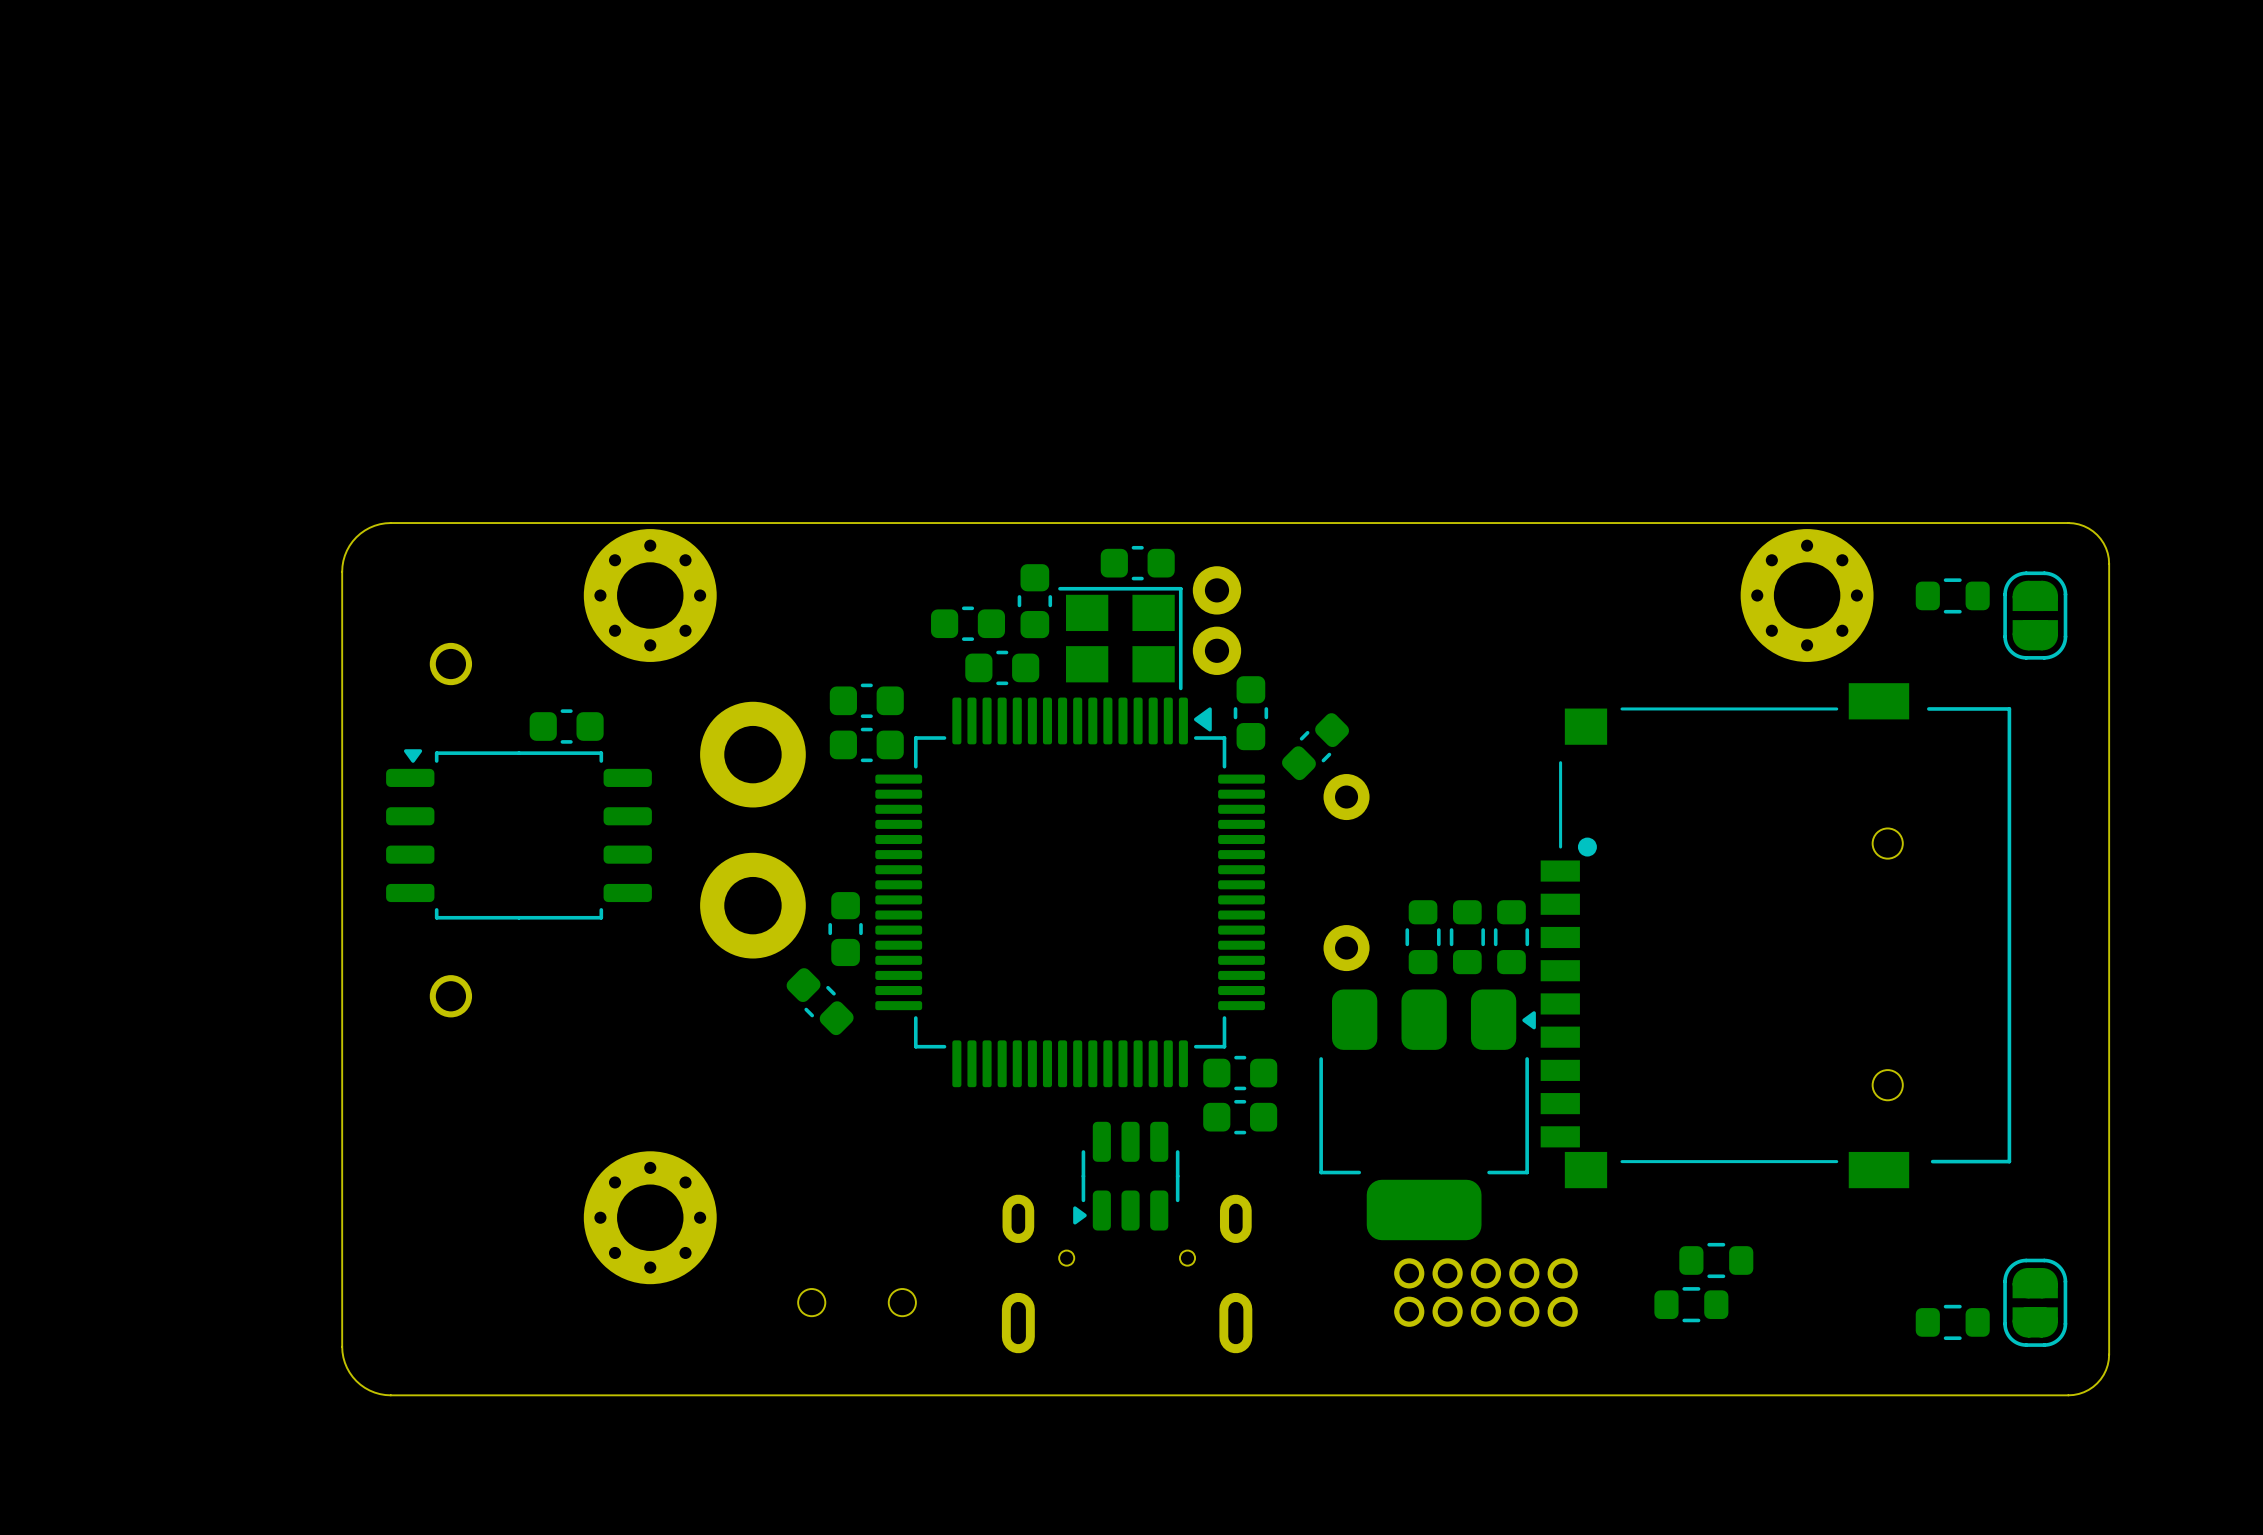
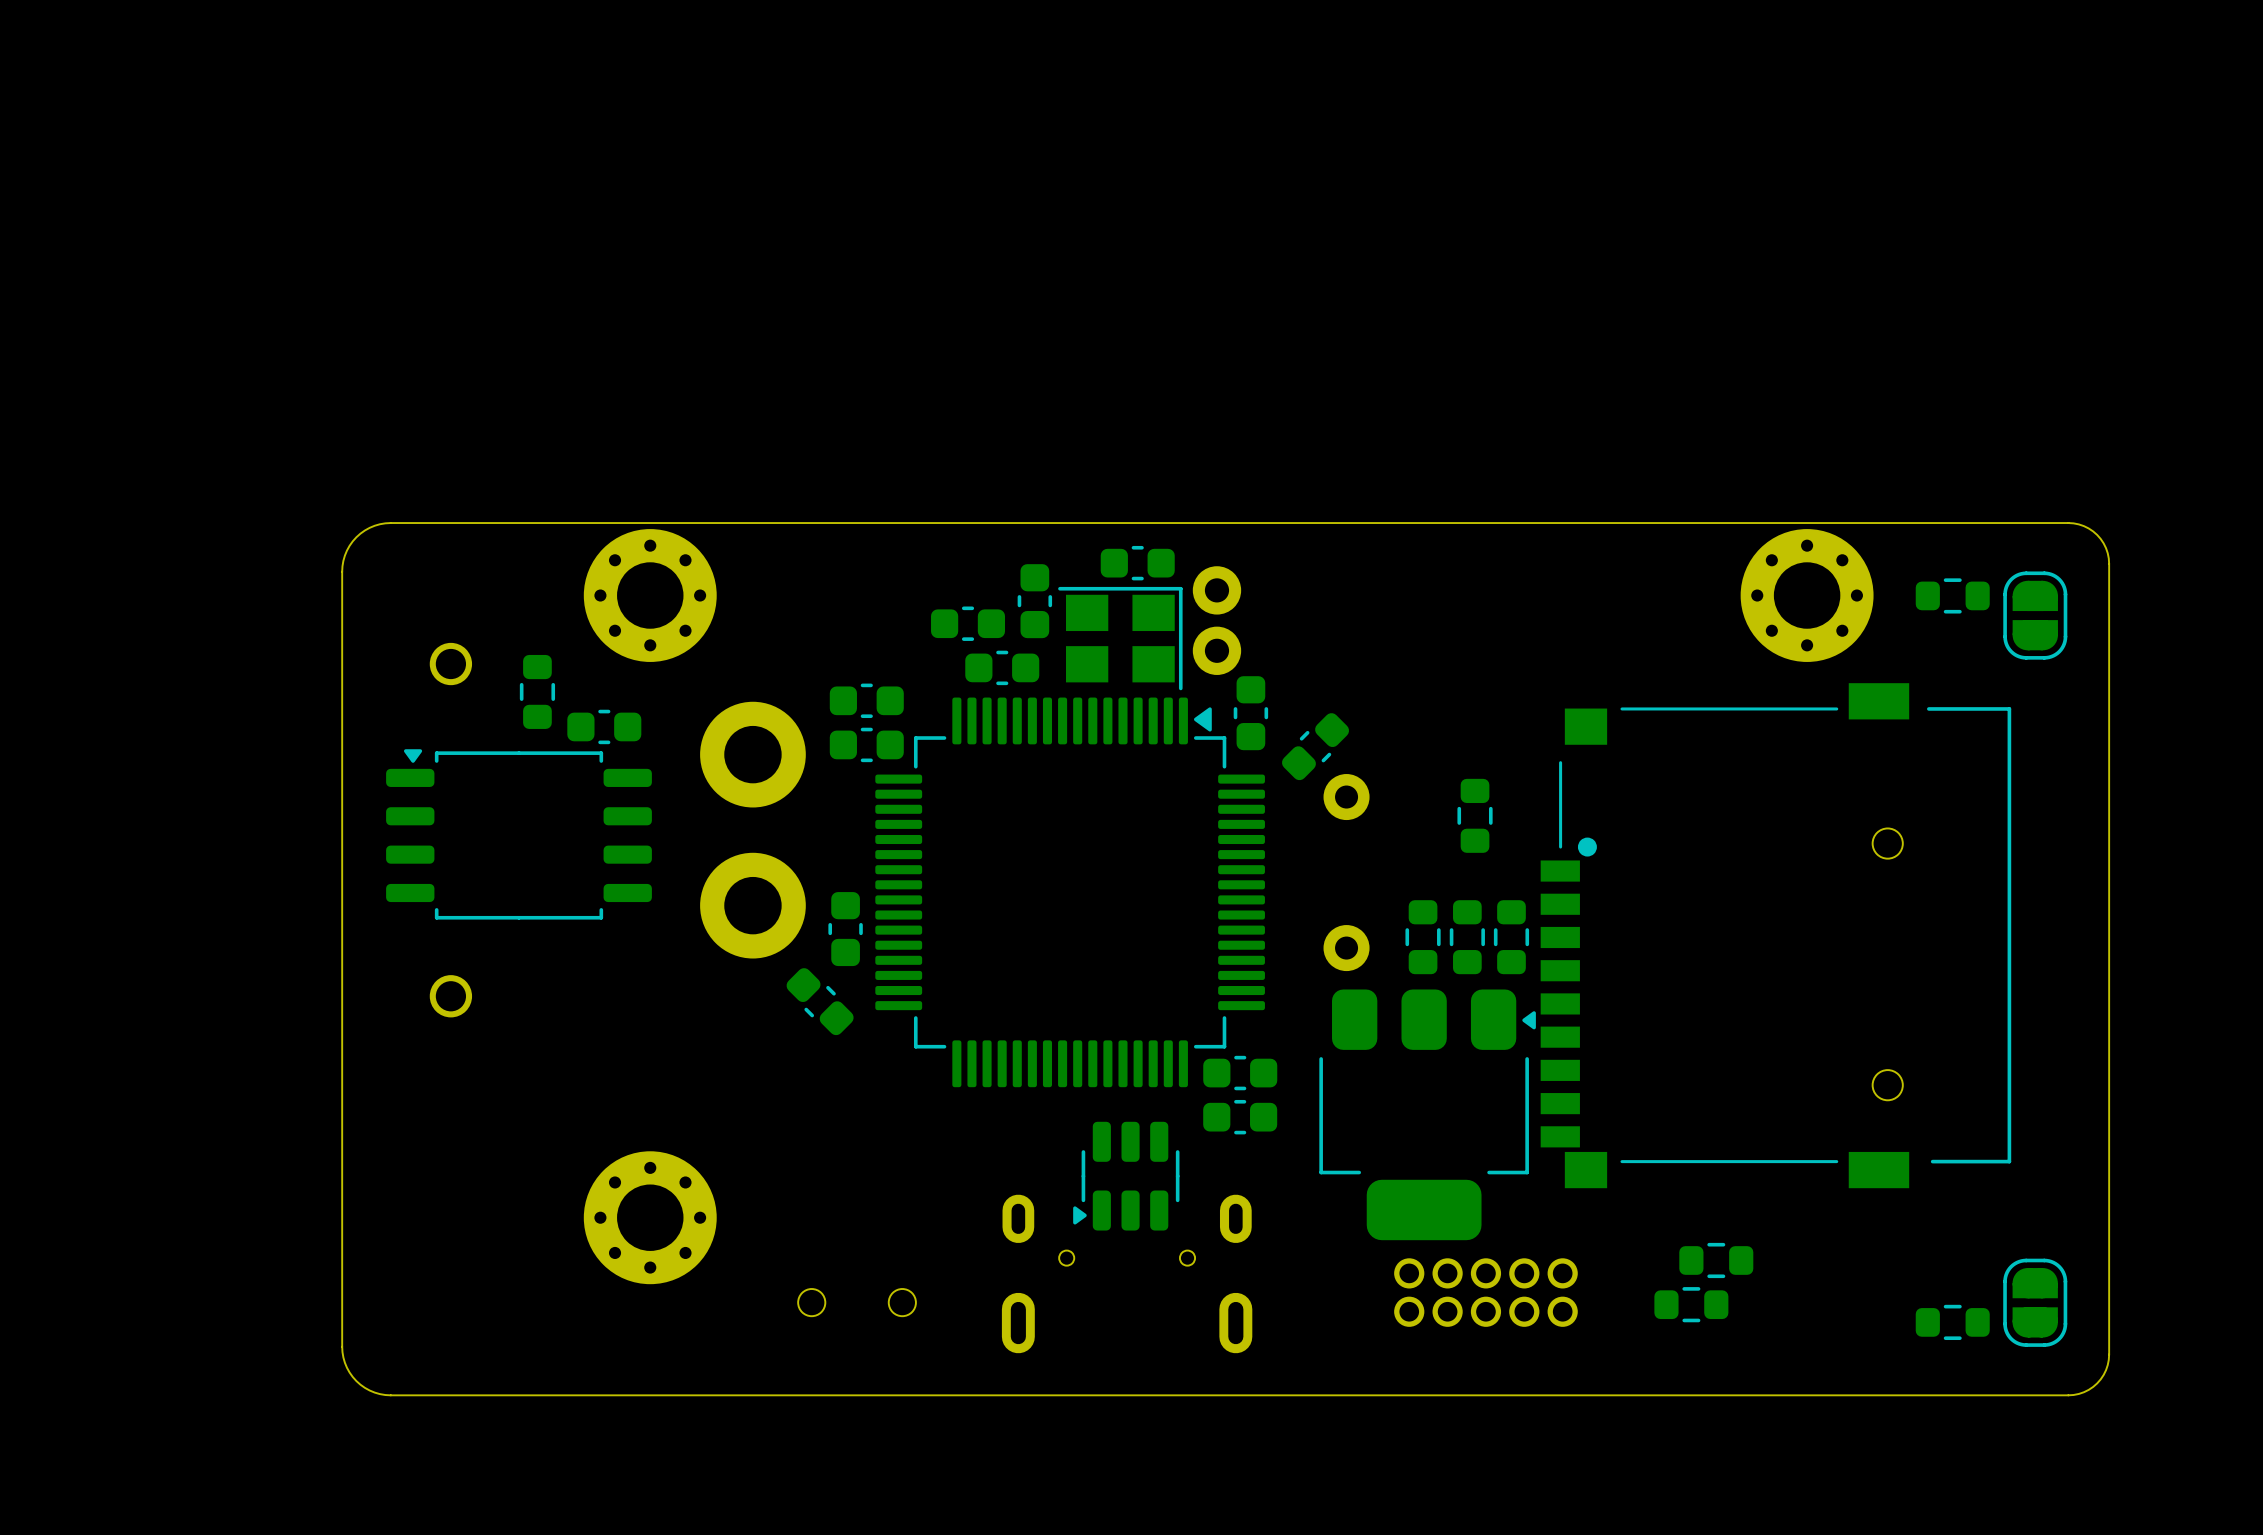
part: none -> (537, 691)
part position: (566, 726) -> (604, 726)
part: none -> (1475, 815)

